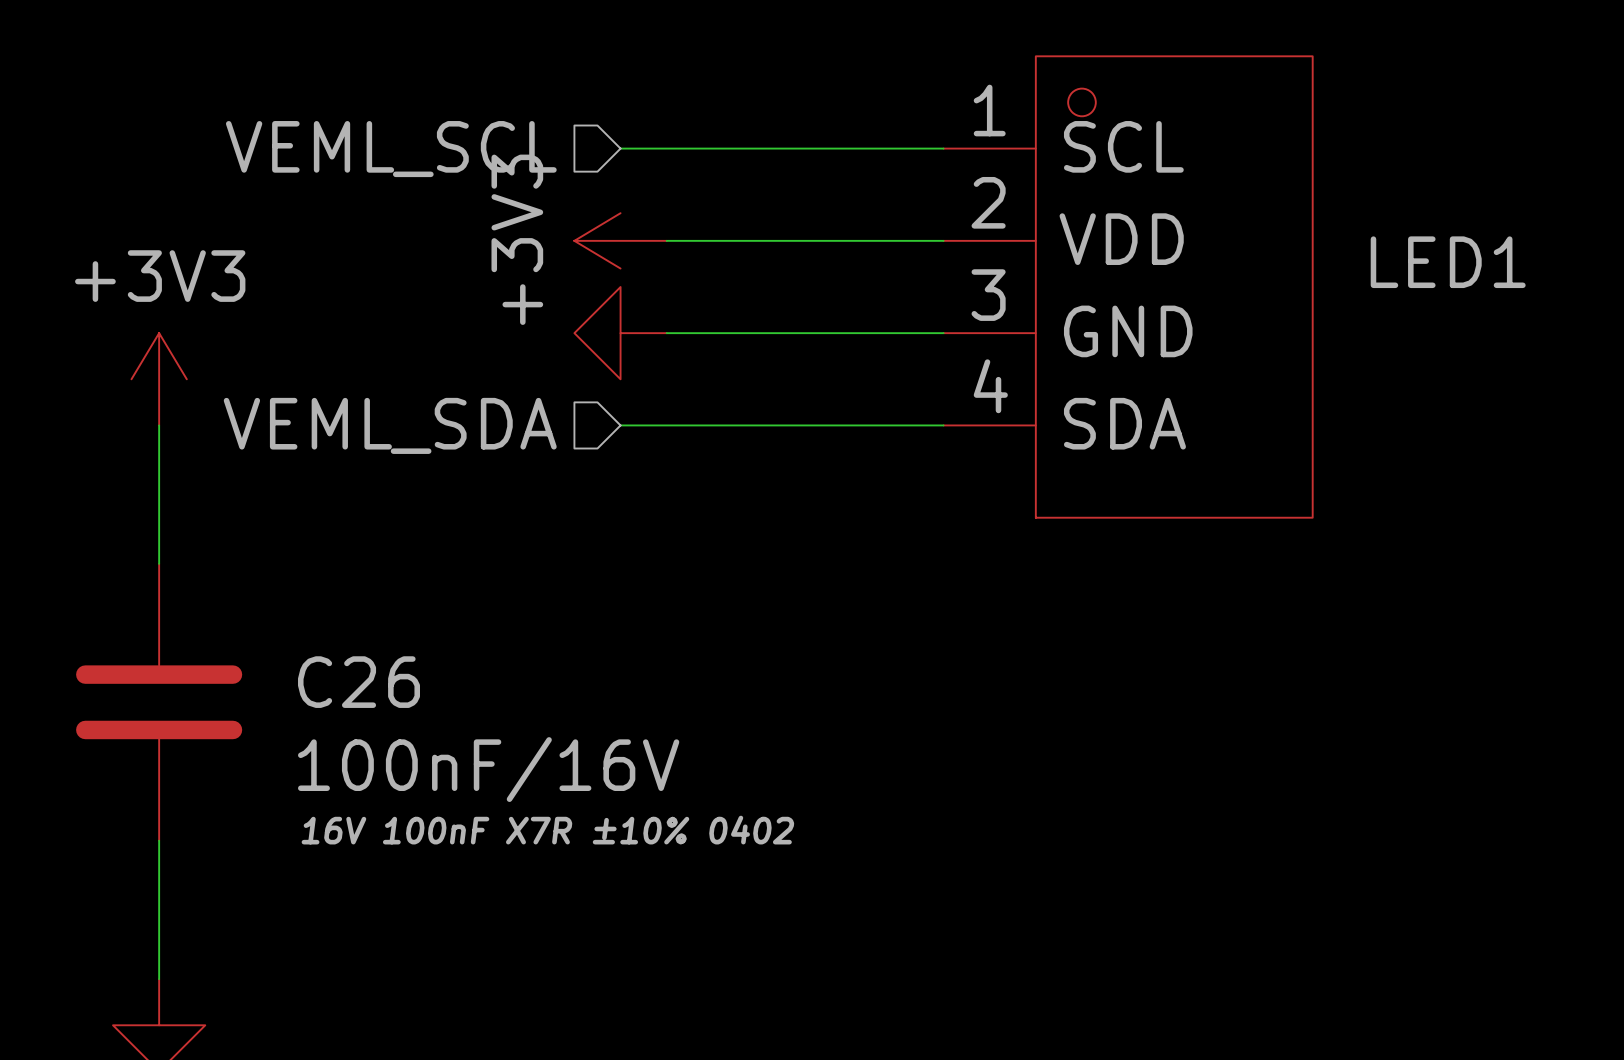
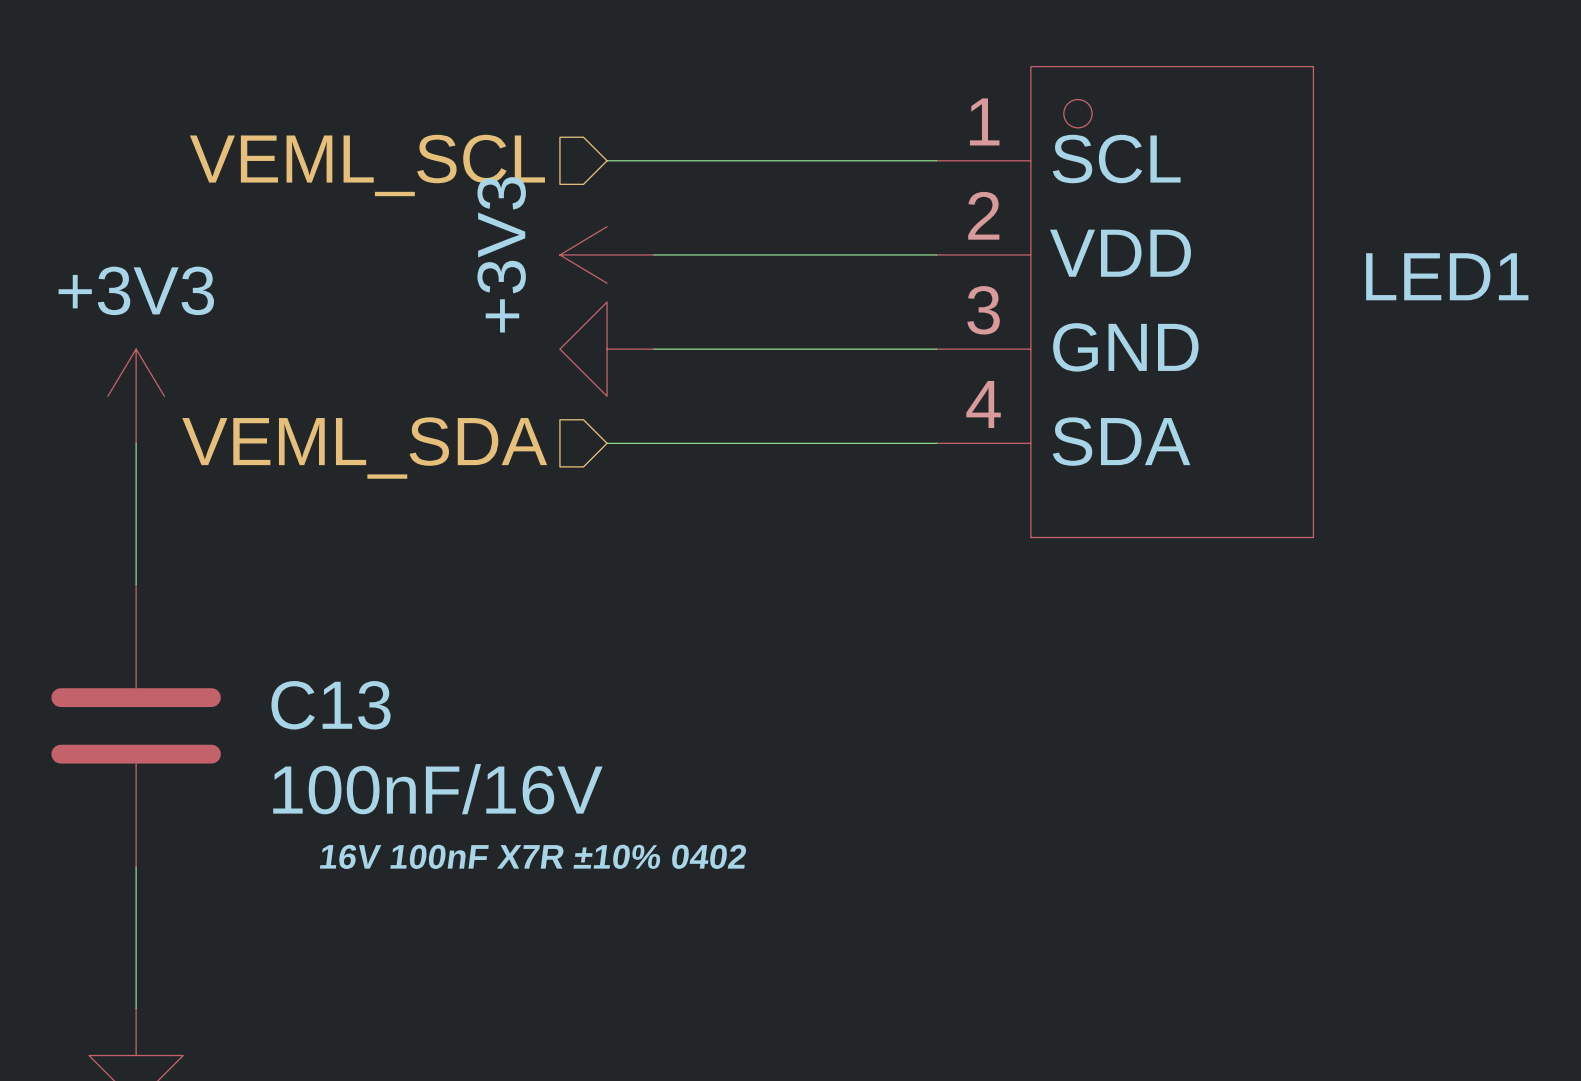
C26 name: C26 (359, 682) -> C13 (331, 705)

